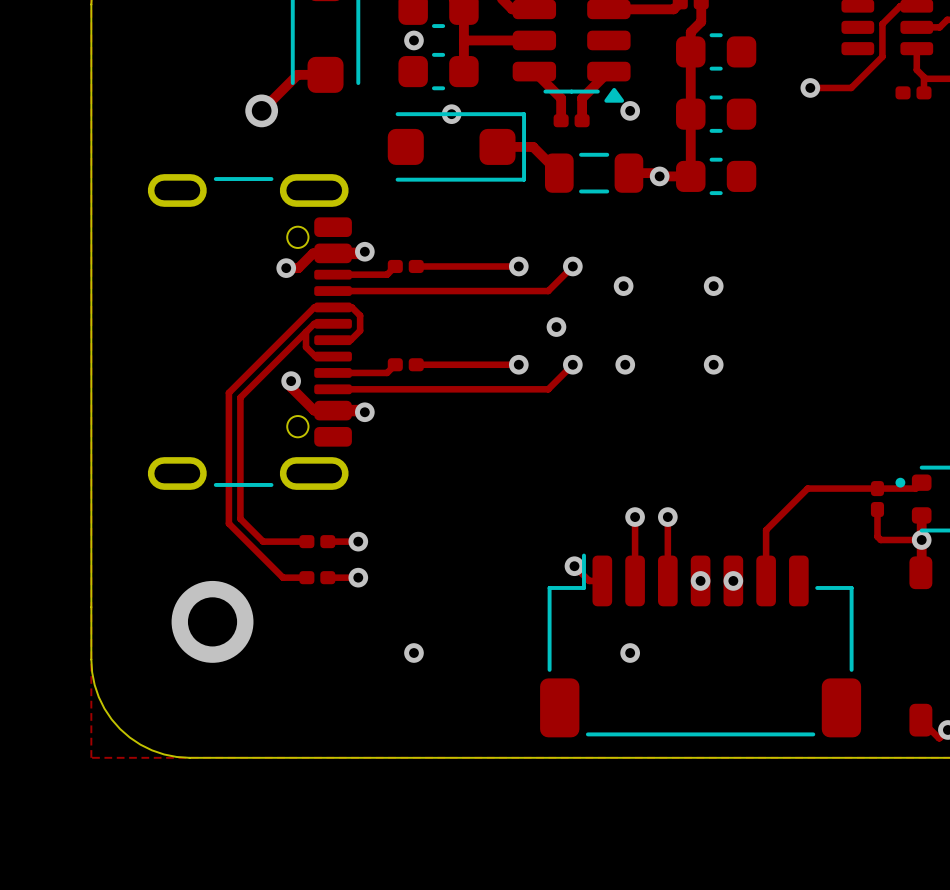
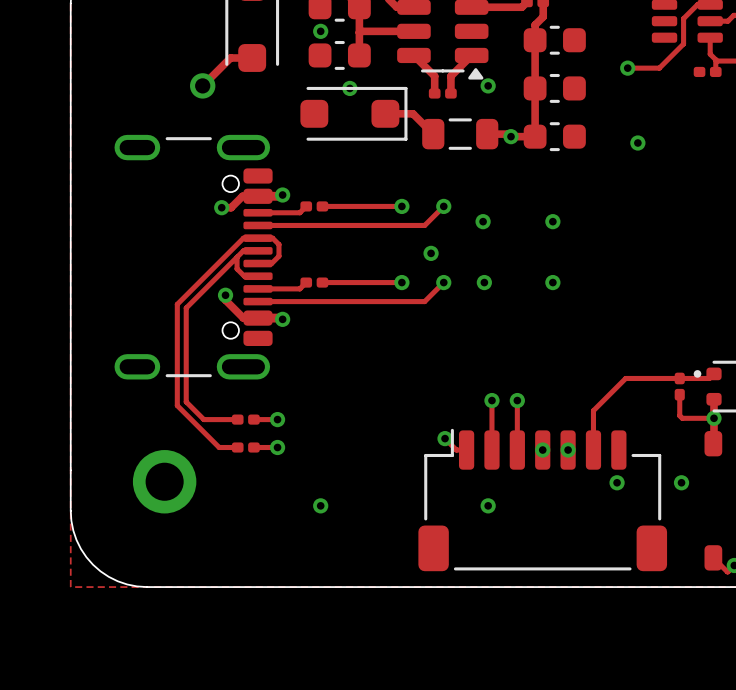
via: none -> (637, 142)
via: none -> (617, 482)
via: none -> (681, 482)

